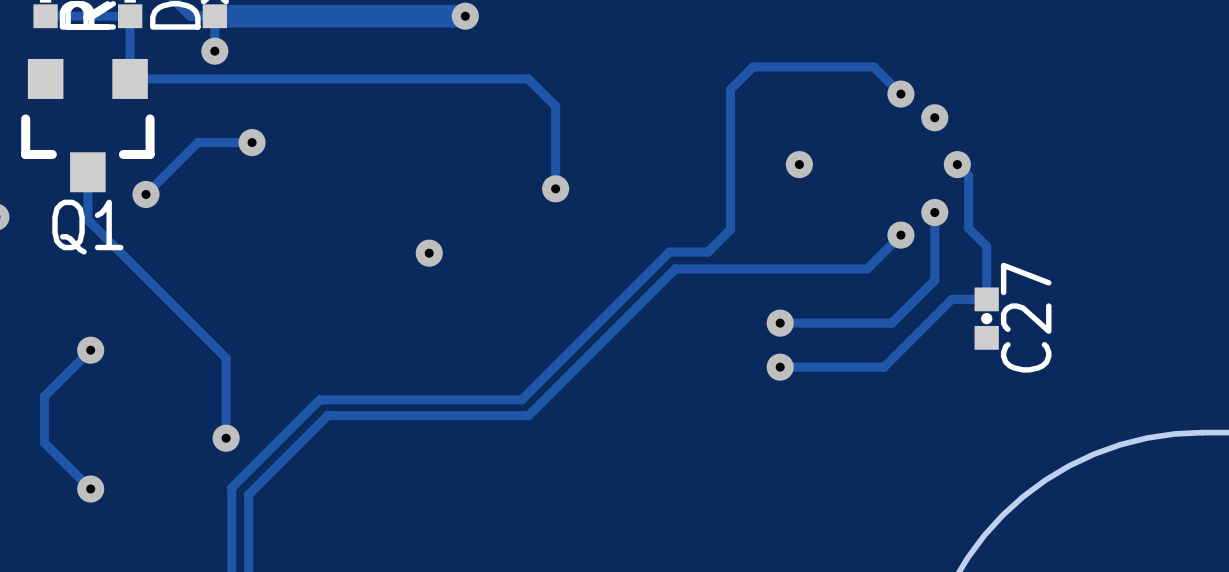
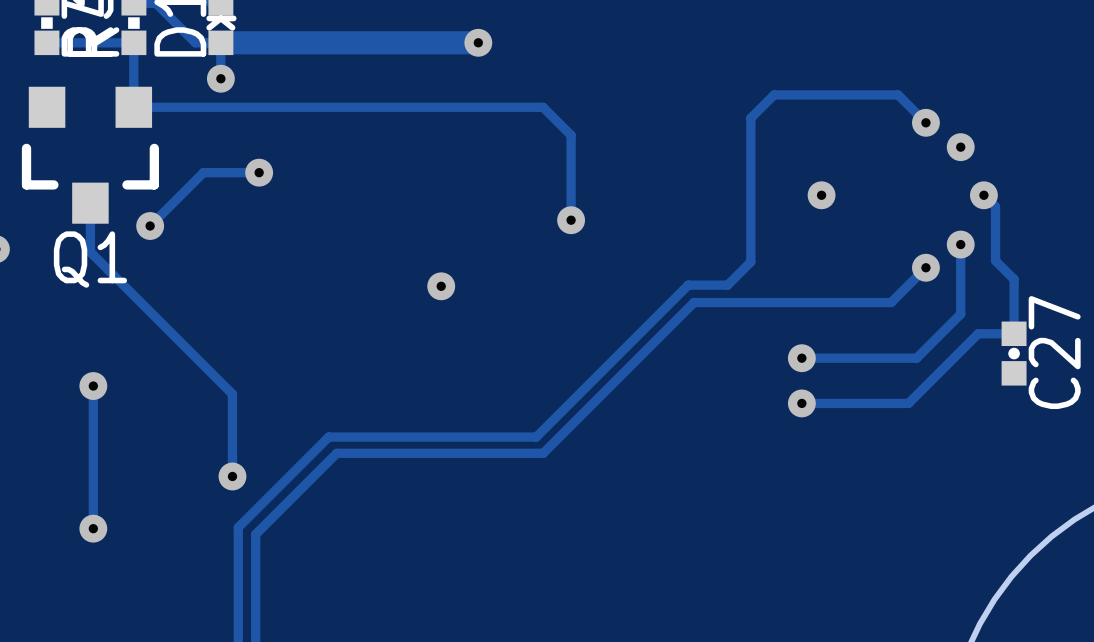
track: (90, 350) (44, 396) (44, 442) (90, 489) -> (93, 386) (93, 528)

